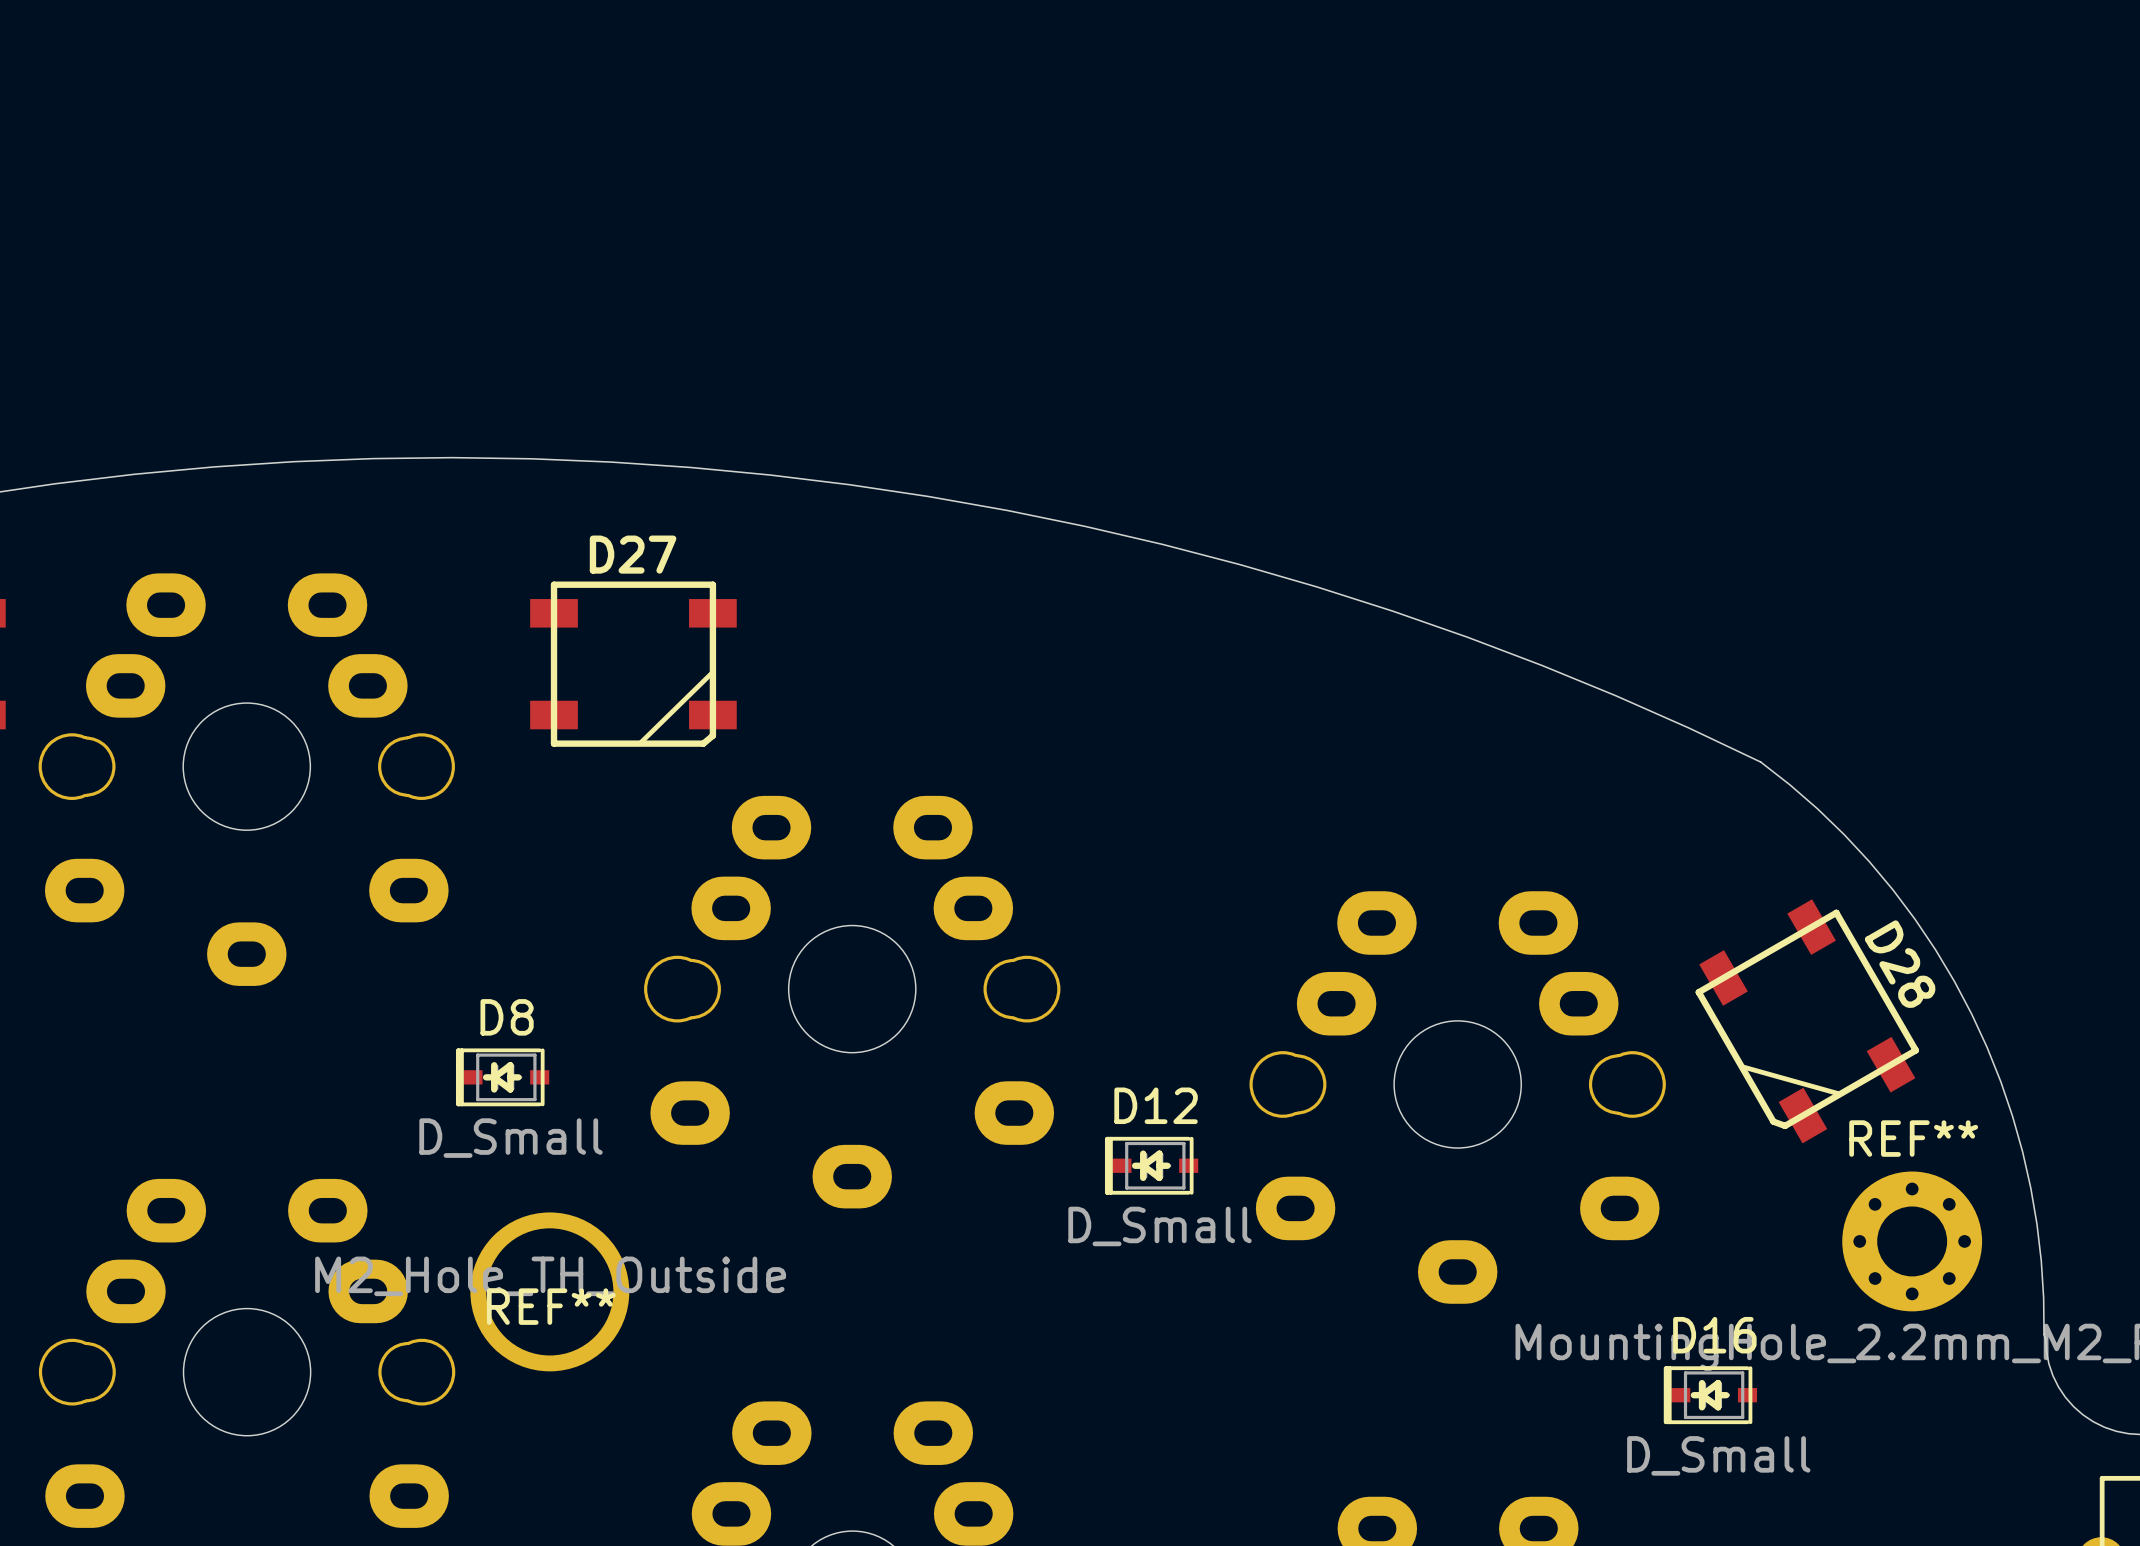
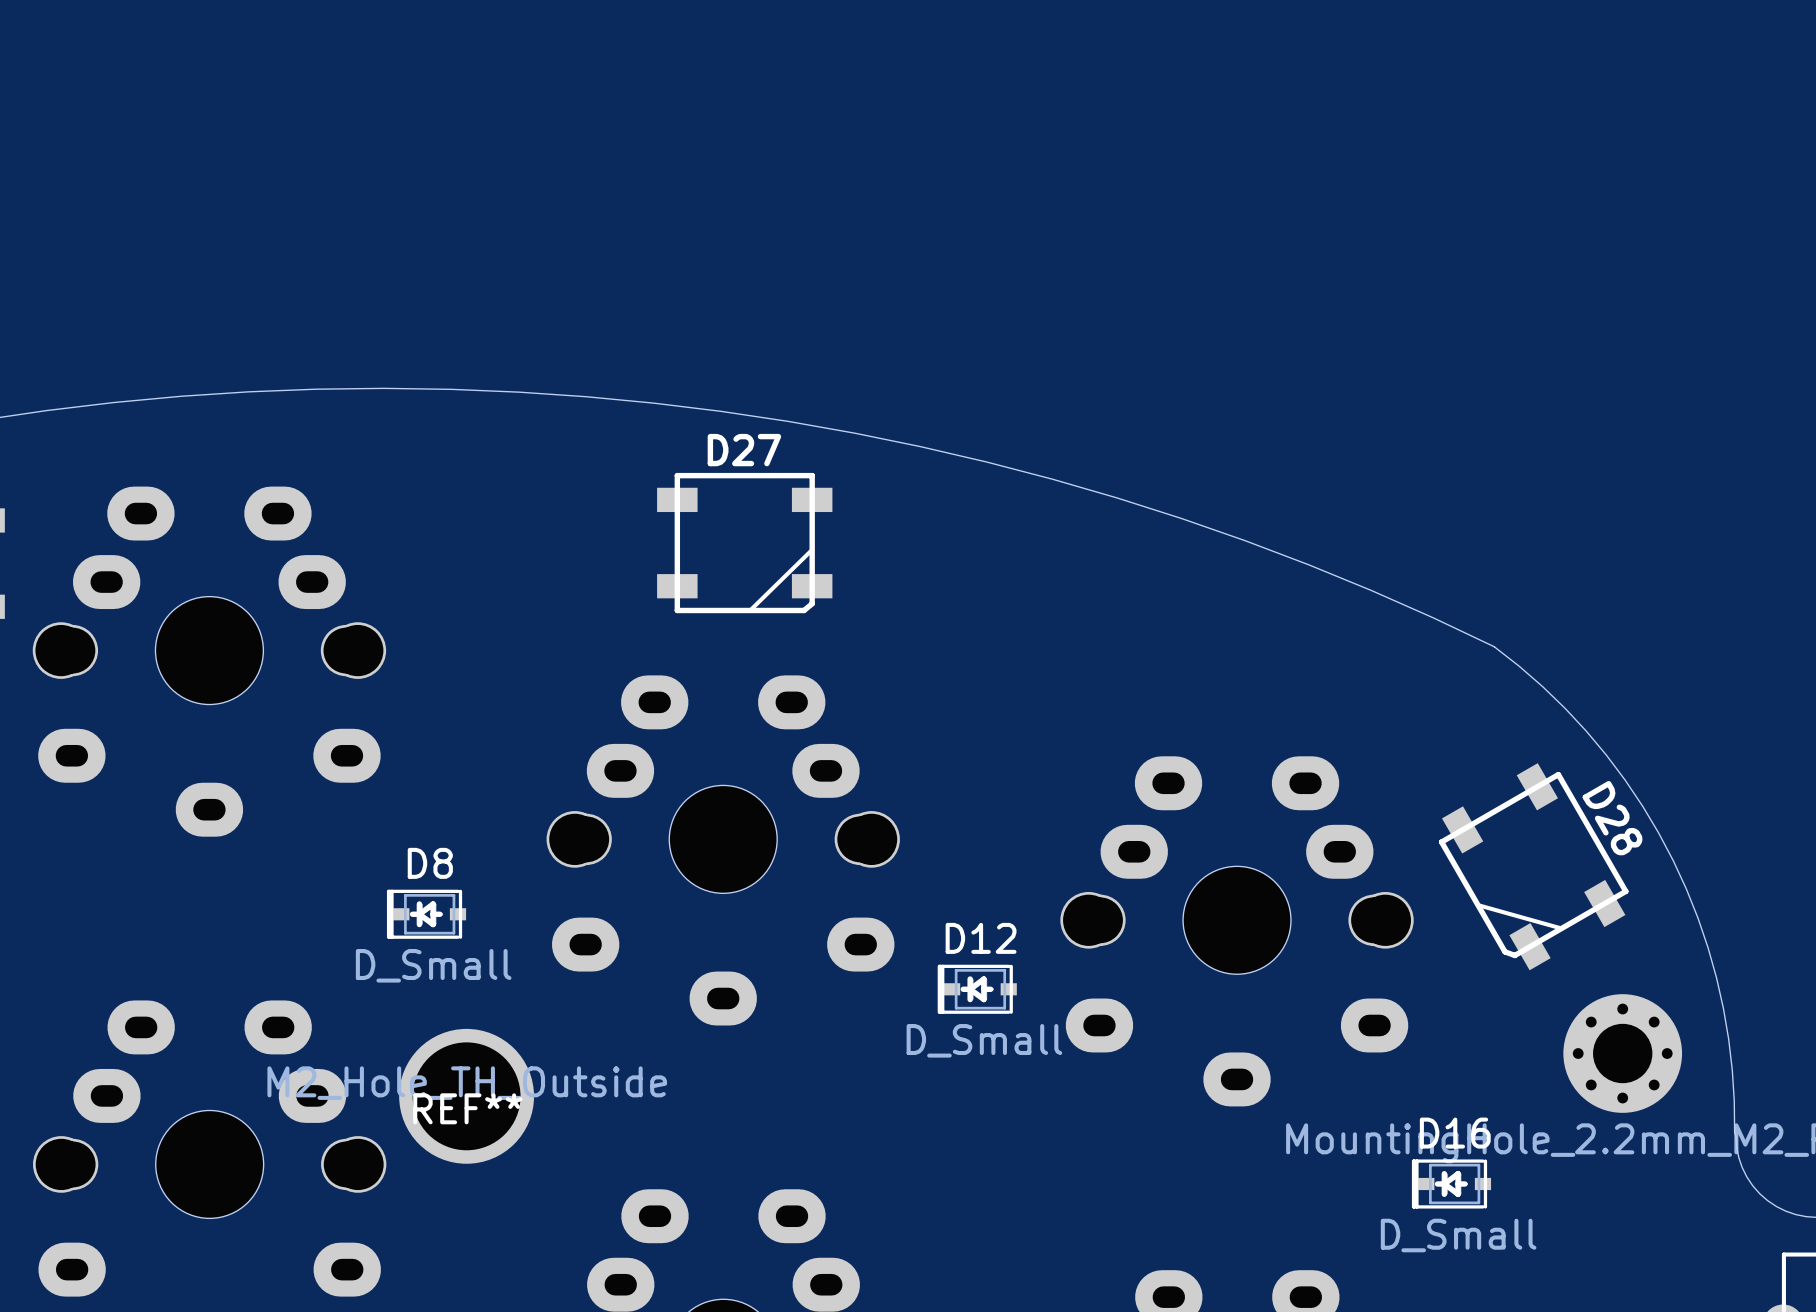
D27 footprint: [530, 581, 737, 747] -> [657, 472, 833, 614]
REF** name: REF** (1913, 1138) -> none

